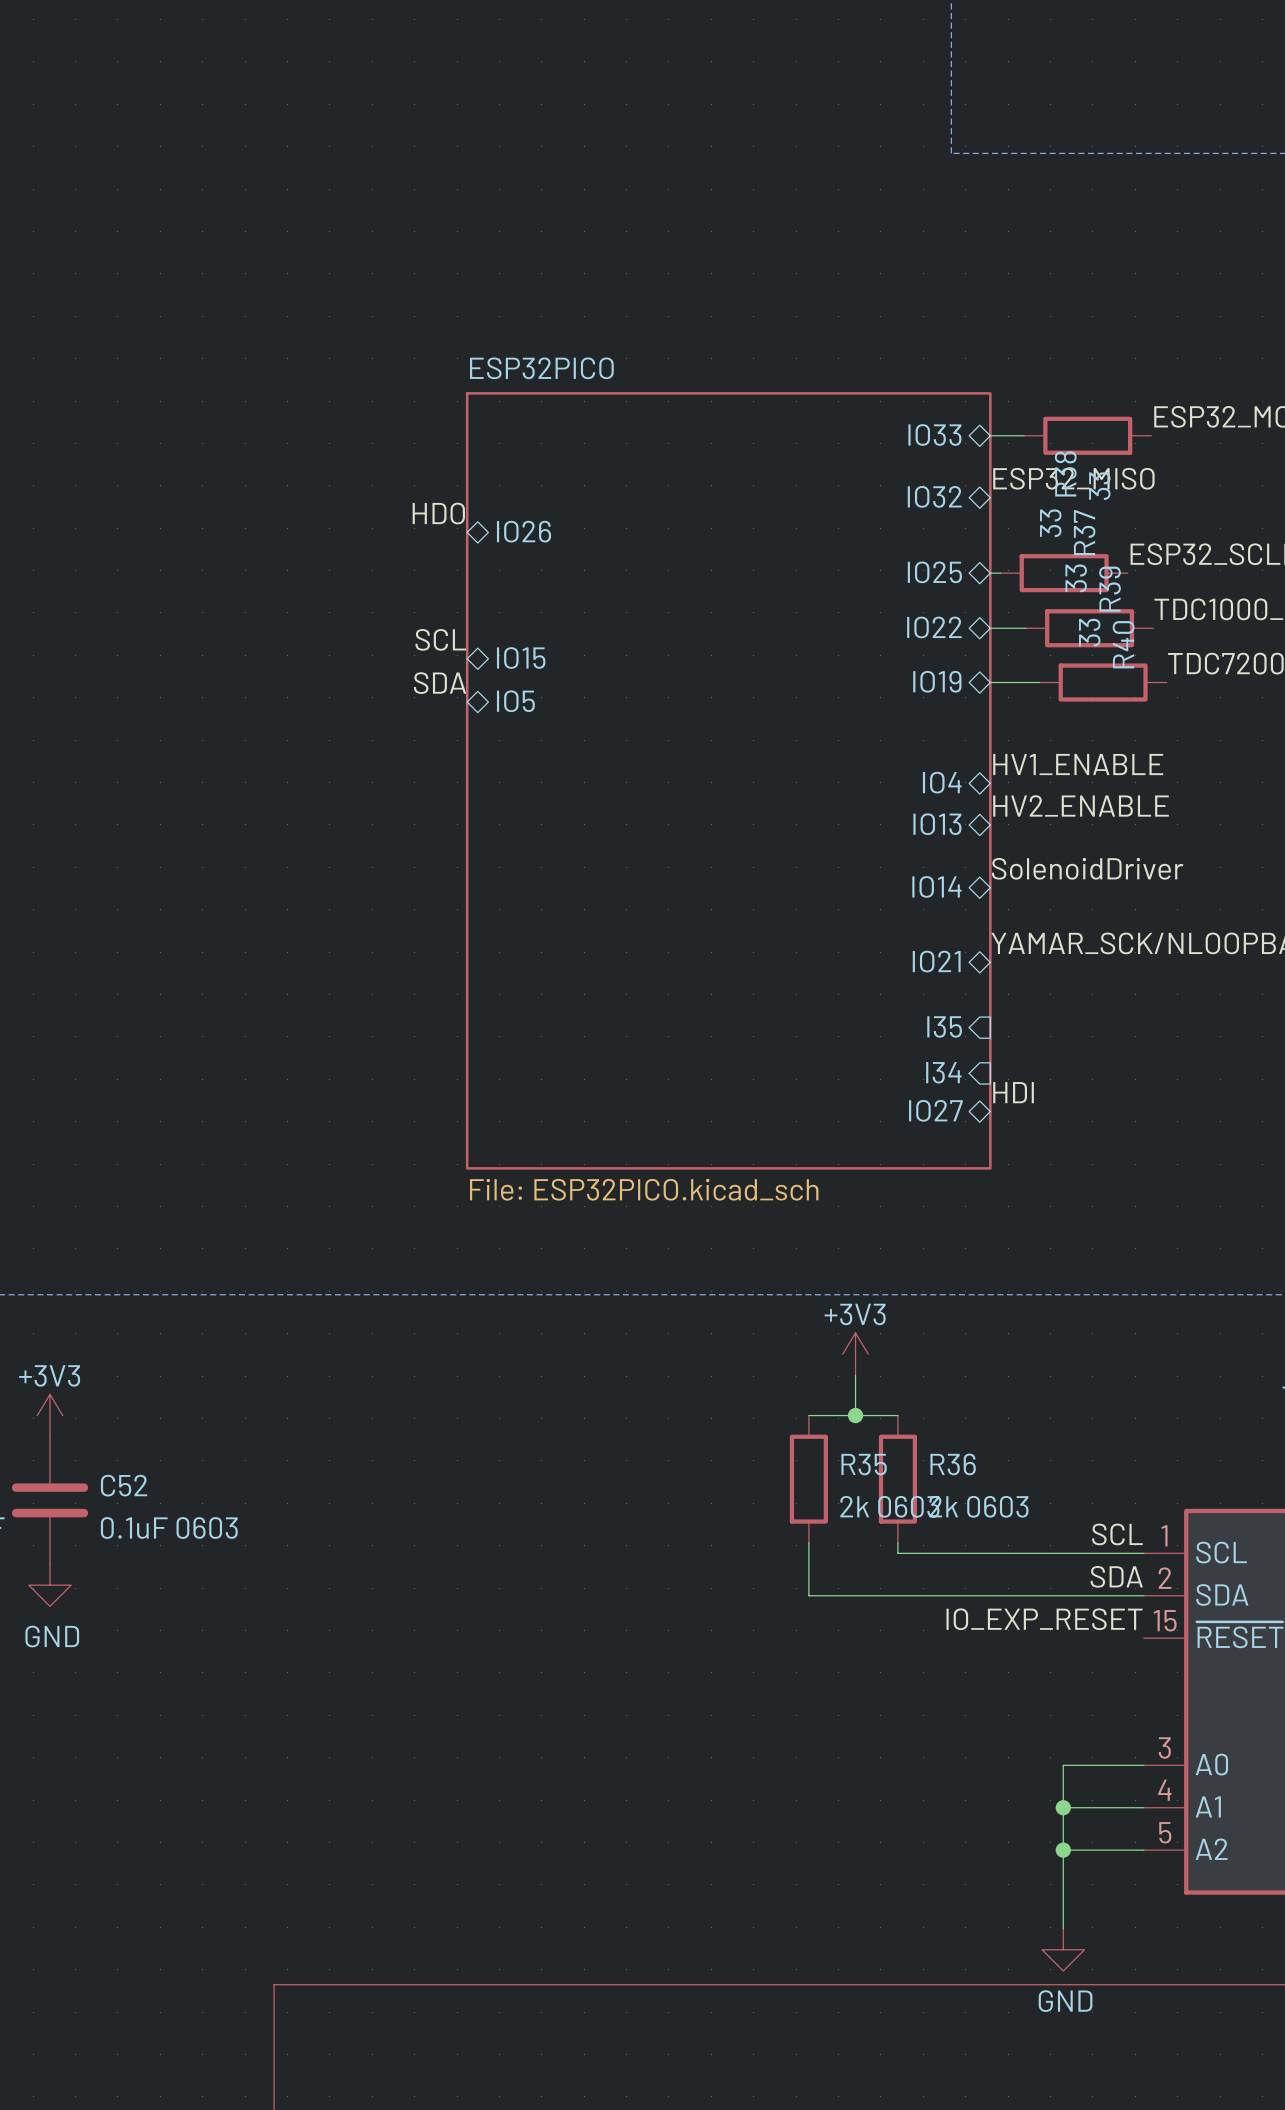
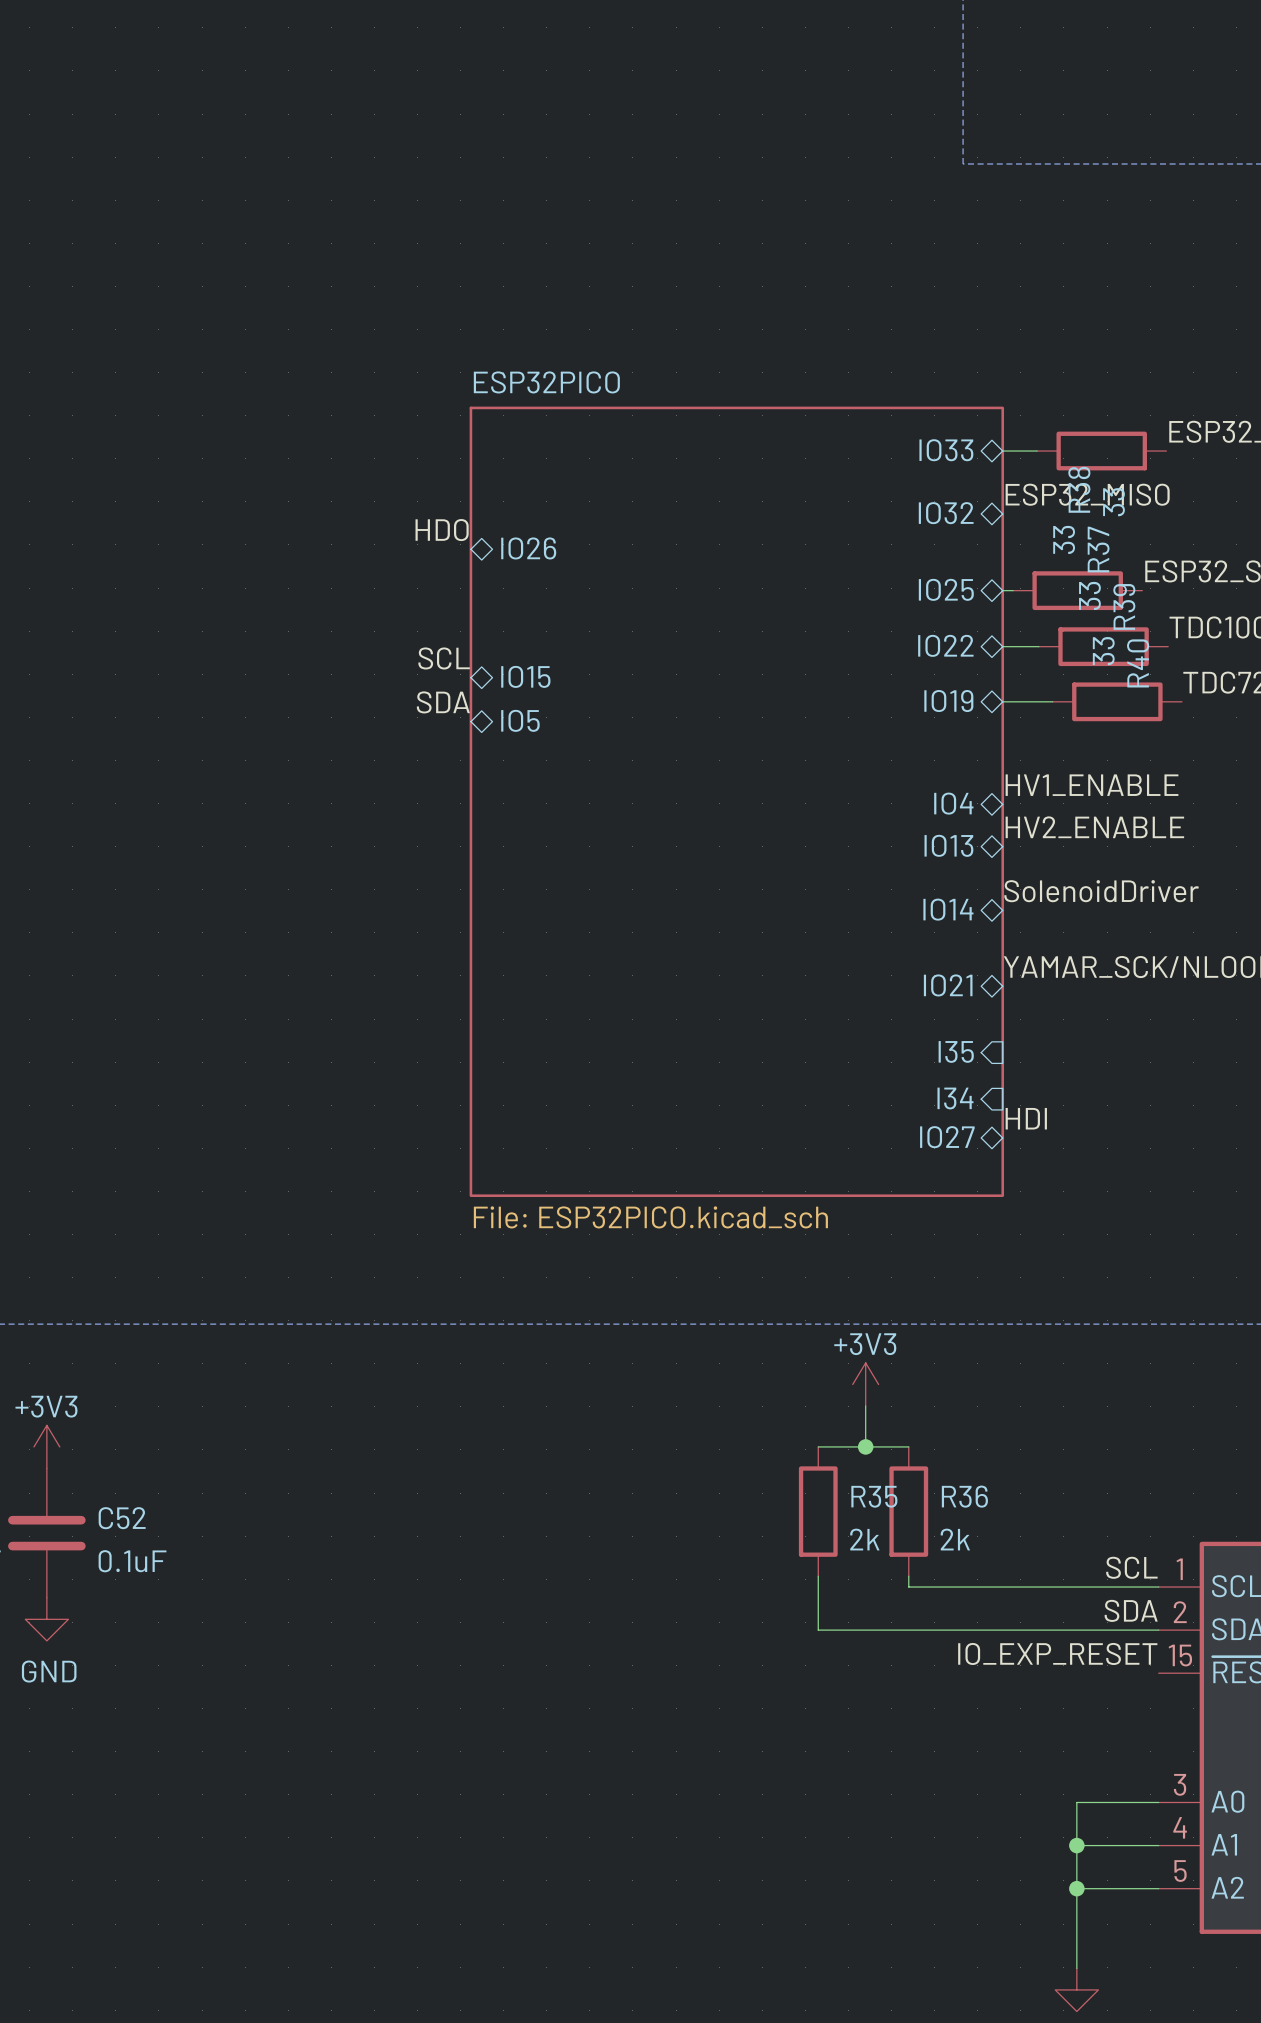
R35 value: 2k 0603 (889, 1506) -> 2k (864, 1539)
R36 value: 2k 0603 (978, 1506) -> 2k (955, 1539)
C52 value: 0.1uF 0603 (169, 1527) -> 0.1uF (132, 1561)

